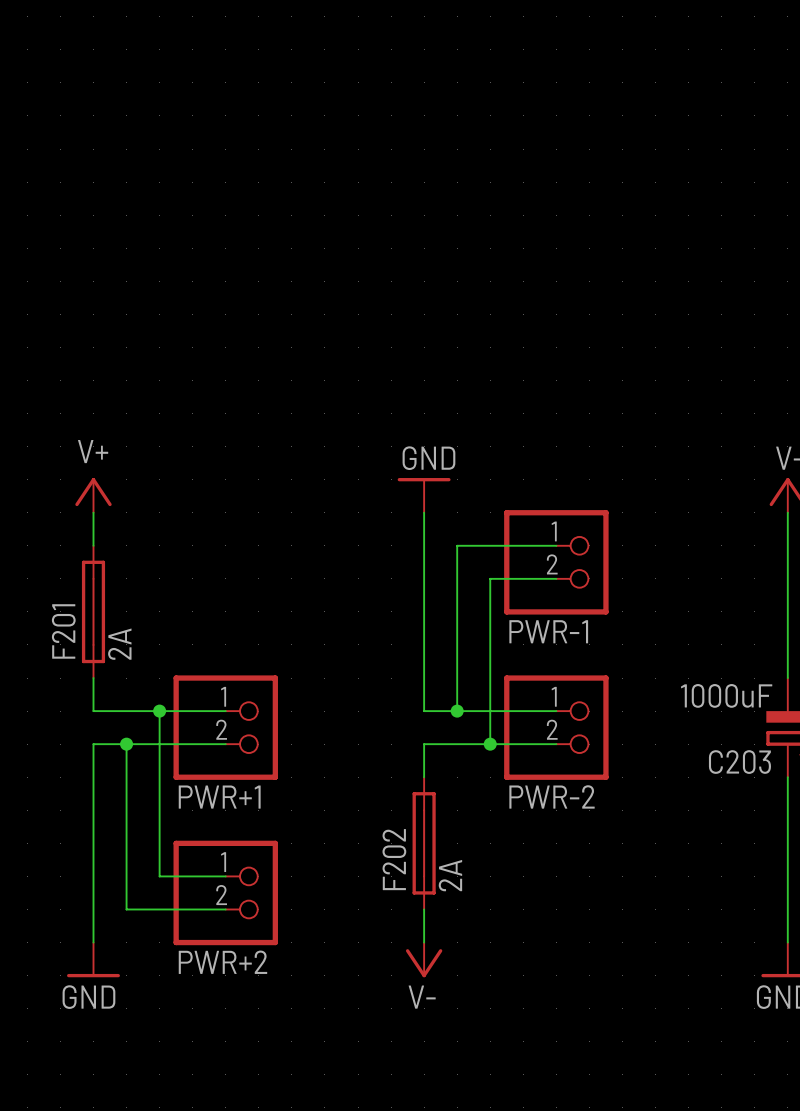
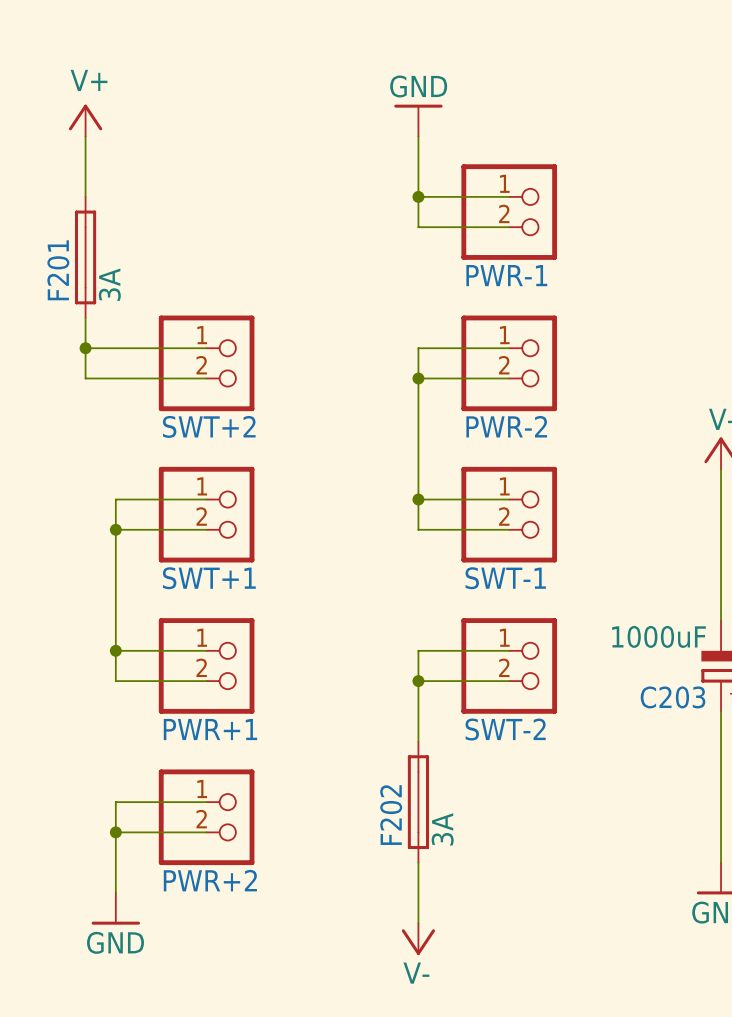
power symbol: none -> V+ (85, 120)
power symbol: none -> GND (418, 120)
wire: none -> (85, 136) (85, 196)
wire: none -> (418, 136) (418, 227) (509, 227)
wire: none -> (418, 196) (509, 196)
junction: none -> (418, 196)
PWR-1: none -> (509, 212)
wire: none -> (85, 317) (85, 378) (206, 378)
wire: none -> (85, 348) (206, 348)
junction: none -> (85, 348)
wire: none -> (509, 348) (418, 348) (418, 499)
SWT+2: none -> (206, 363)
PWR-2: none -> (509, 363)
wire: none -> (418, 378) (509, 378)
junction: none -> (418, 378)
power symbol: V+ (93, 495) -> none
power symbol: GND (424, 495) -> none
wire: (93, 512) (93, 545) -> none
wire: (424, 512) (424, 711) (457, 711) (457, 578) -> (448, 529) (418, 529)
wire: none -> (206, 499) (115, 499) (115, 681)
junction: none -> (418, 499)
SWT+1: none -> (206, 514)
wire: none -> (115, 529) (206, 529)
junction: none -> (115, 529)
wire: (490, 578) (490, 744) -> none
F201 position: (93, 611) -> (85, 257)
PWR-1 name: PWR-1 (548, 631) -> SWT-1 (505, 578)
F201 value: 2A (119, 644) -> 3A (109, 284)
wire: (93, 678) (93, 711) (126, 711) -> none
junction: none -> (115, 650)
wire: (159, 711) (159, 876) -> none
junction: (159, 711) -> none
wire: none -> (418, 650) (418, 741)
junction: (457, 711) -> none
junction: (126, 744) -> none
wire: (457, 744) (424, 744) (424, 777) -> none
junction: none -> (418, 681)
junction: (490, 744) -> none
PWR-2 name: PWR-2 (552, 796) -> SWT-2 (505, 729)
F202 position: (424, 843) -> (418, 802)
F202 value: 2A (450, 875) -> 3A (442, 829)
wire: (126, 876) (126, 744) (93, 744) (93, 942) -> (115, 802) (146, 802)
wire: none -> (115, 832) (115, 892)
junction: none -> (115, 832)
wire: (424, 909) (424, 942) -> none
wire: none -> (418, 862) (418, 923)
power symbol position: GND (93, 959) -> GND (115, 908)
power symbol position: V- (424, 959) -> V- (418, 939)

